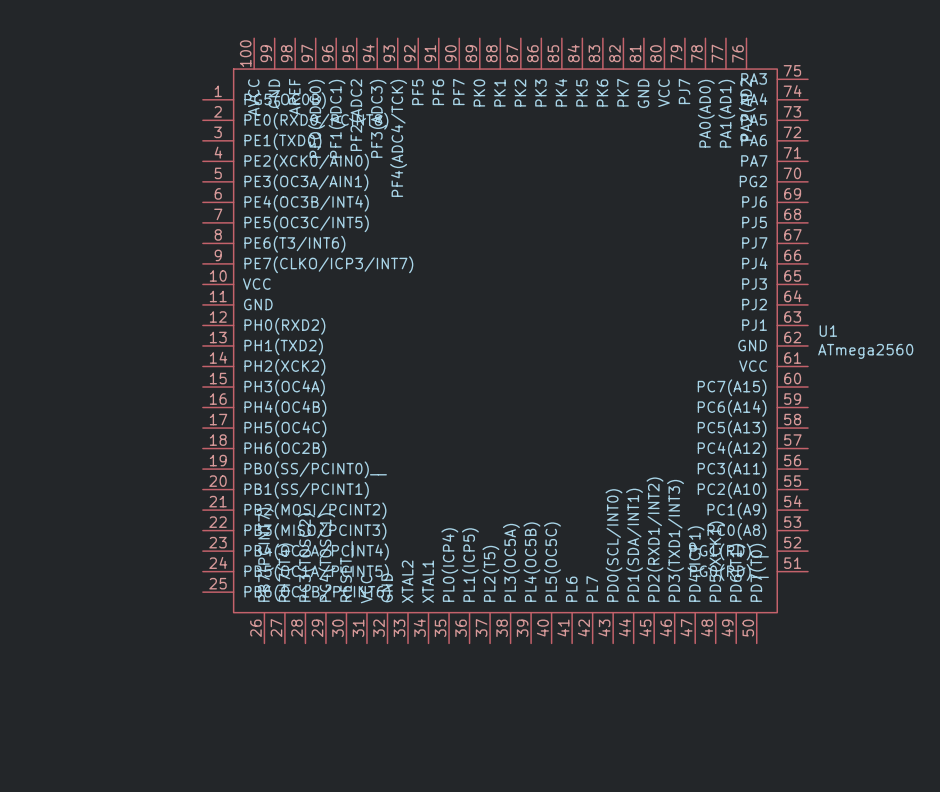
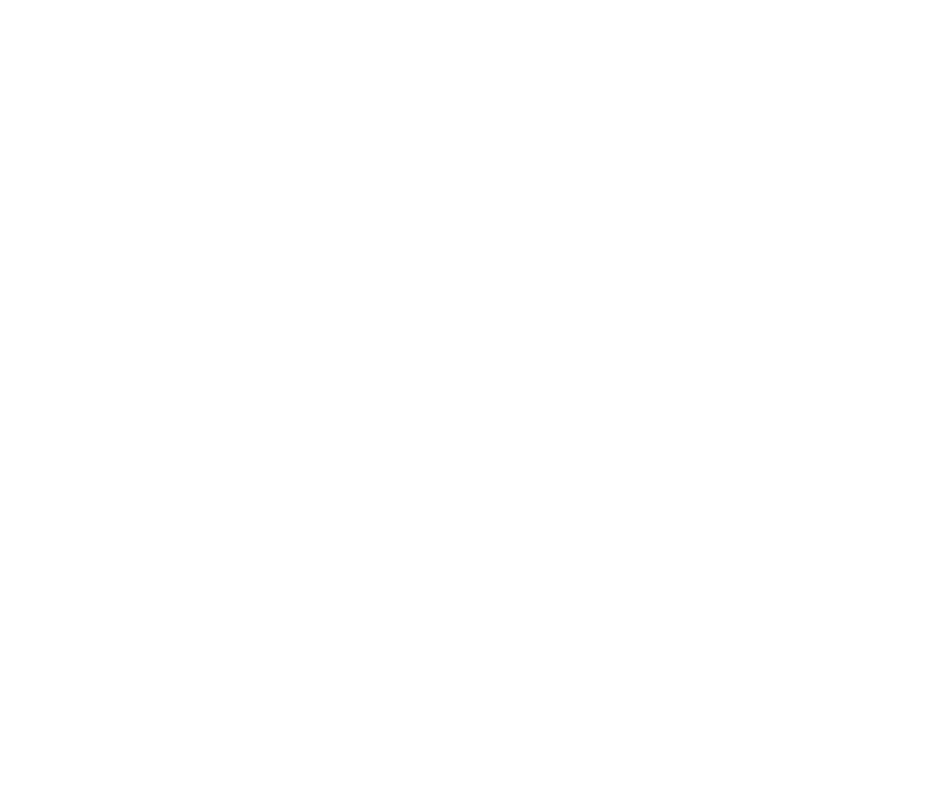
U1: ATmega2560 (505, 340) -> none

